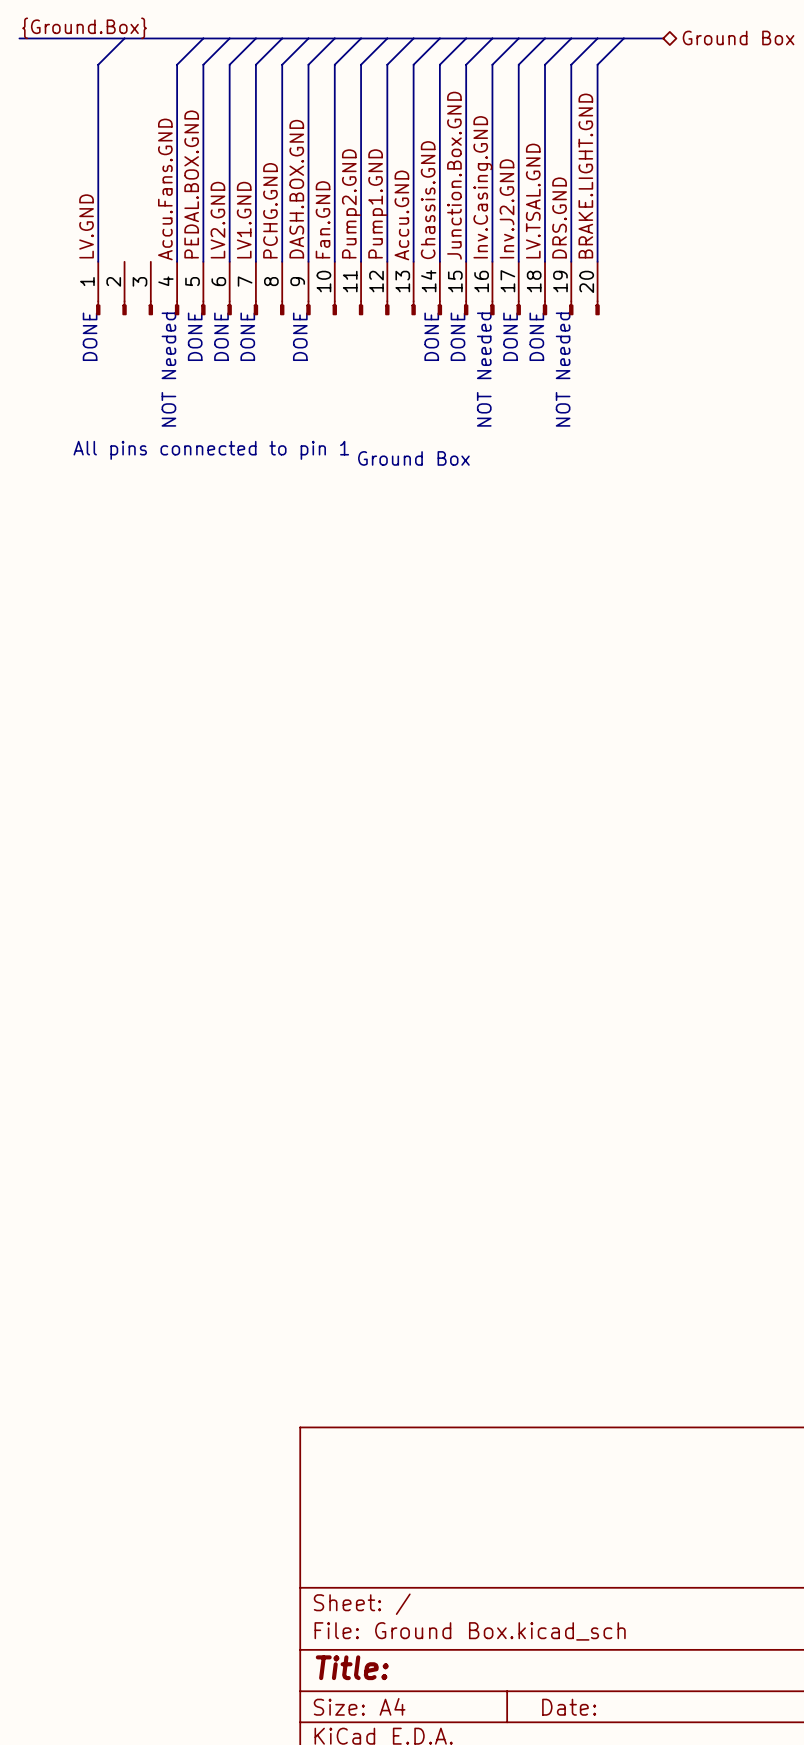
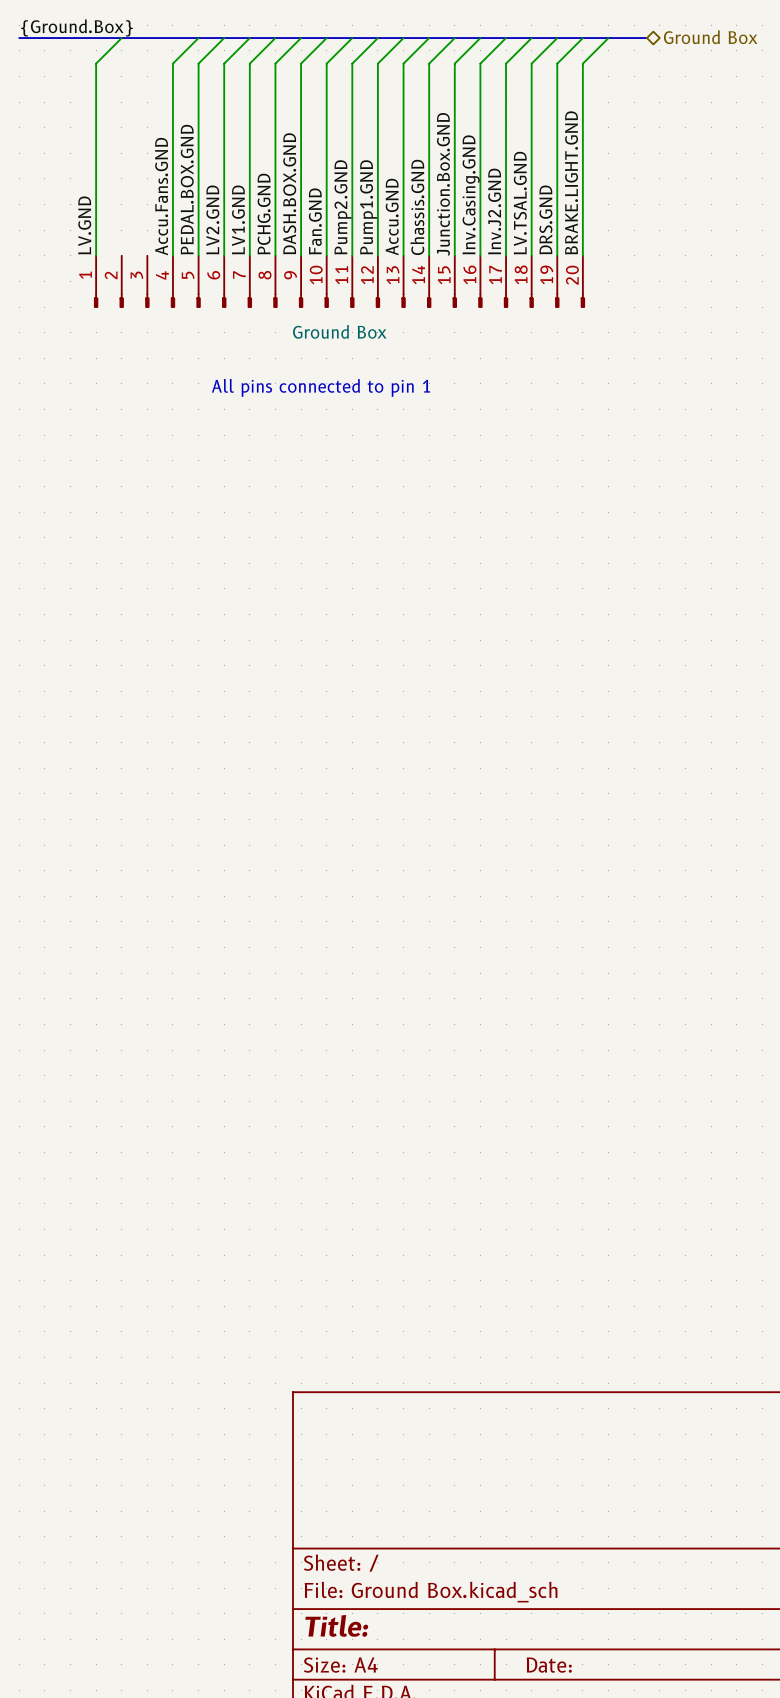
text: DONE (90, 336) -> none
text: DONE (195, 336) -> none
text: DONE (221, 336) -> none
text: DONE (247, 336) -> none
text: DONE (300, 336) -> none
text: DONE (431, 336) -> none
text: DONE (457, 336) -> none
text: DONE (510, 336) -> none
text: DONE (536, 336) -> none
text: NOT Needed (168, 369) -> none
text: NOT Needed (484, 369) -> none
text: NOT Needed (563, 369) -> none
text position: All pins connected to pin 1 (211, 450) -> All pins connected to pin 1 (321, 387)
part value position: Ground Box (413, 458) -> Ground Box (339, 331)

